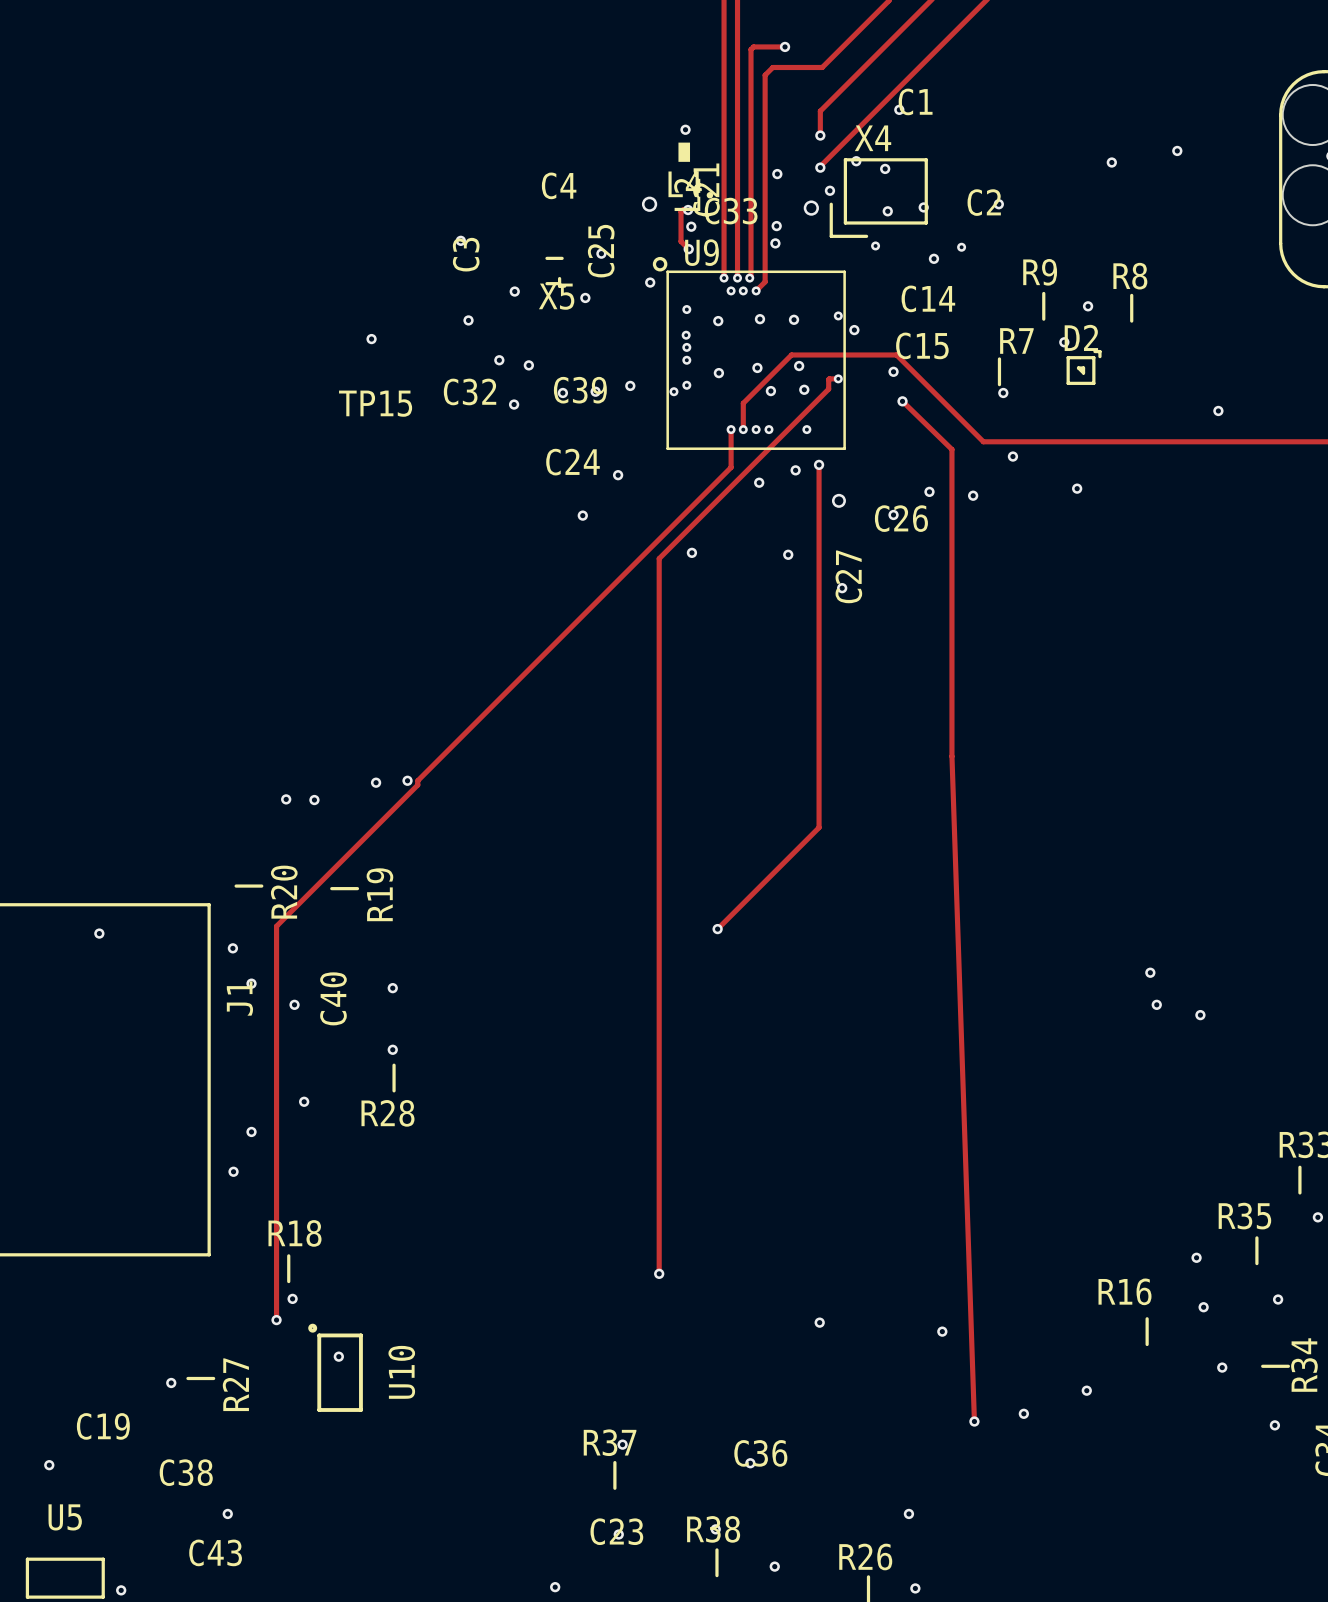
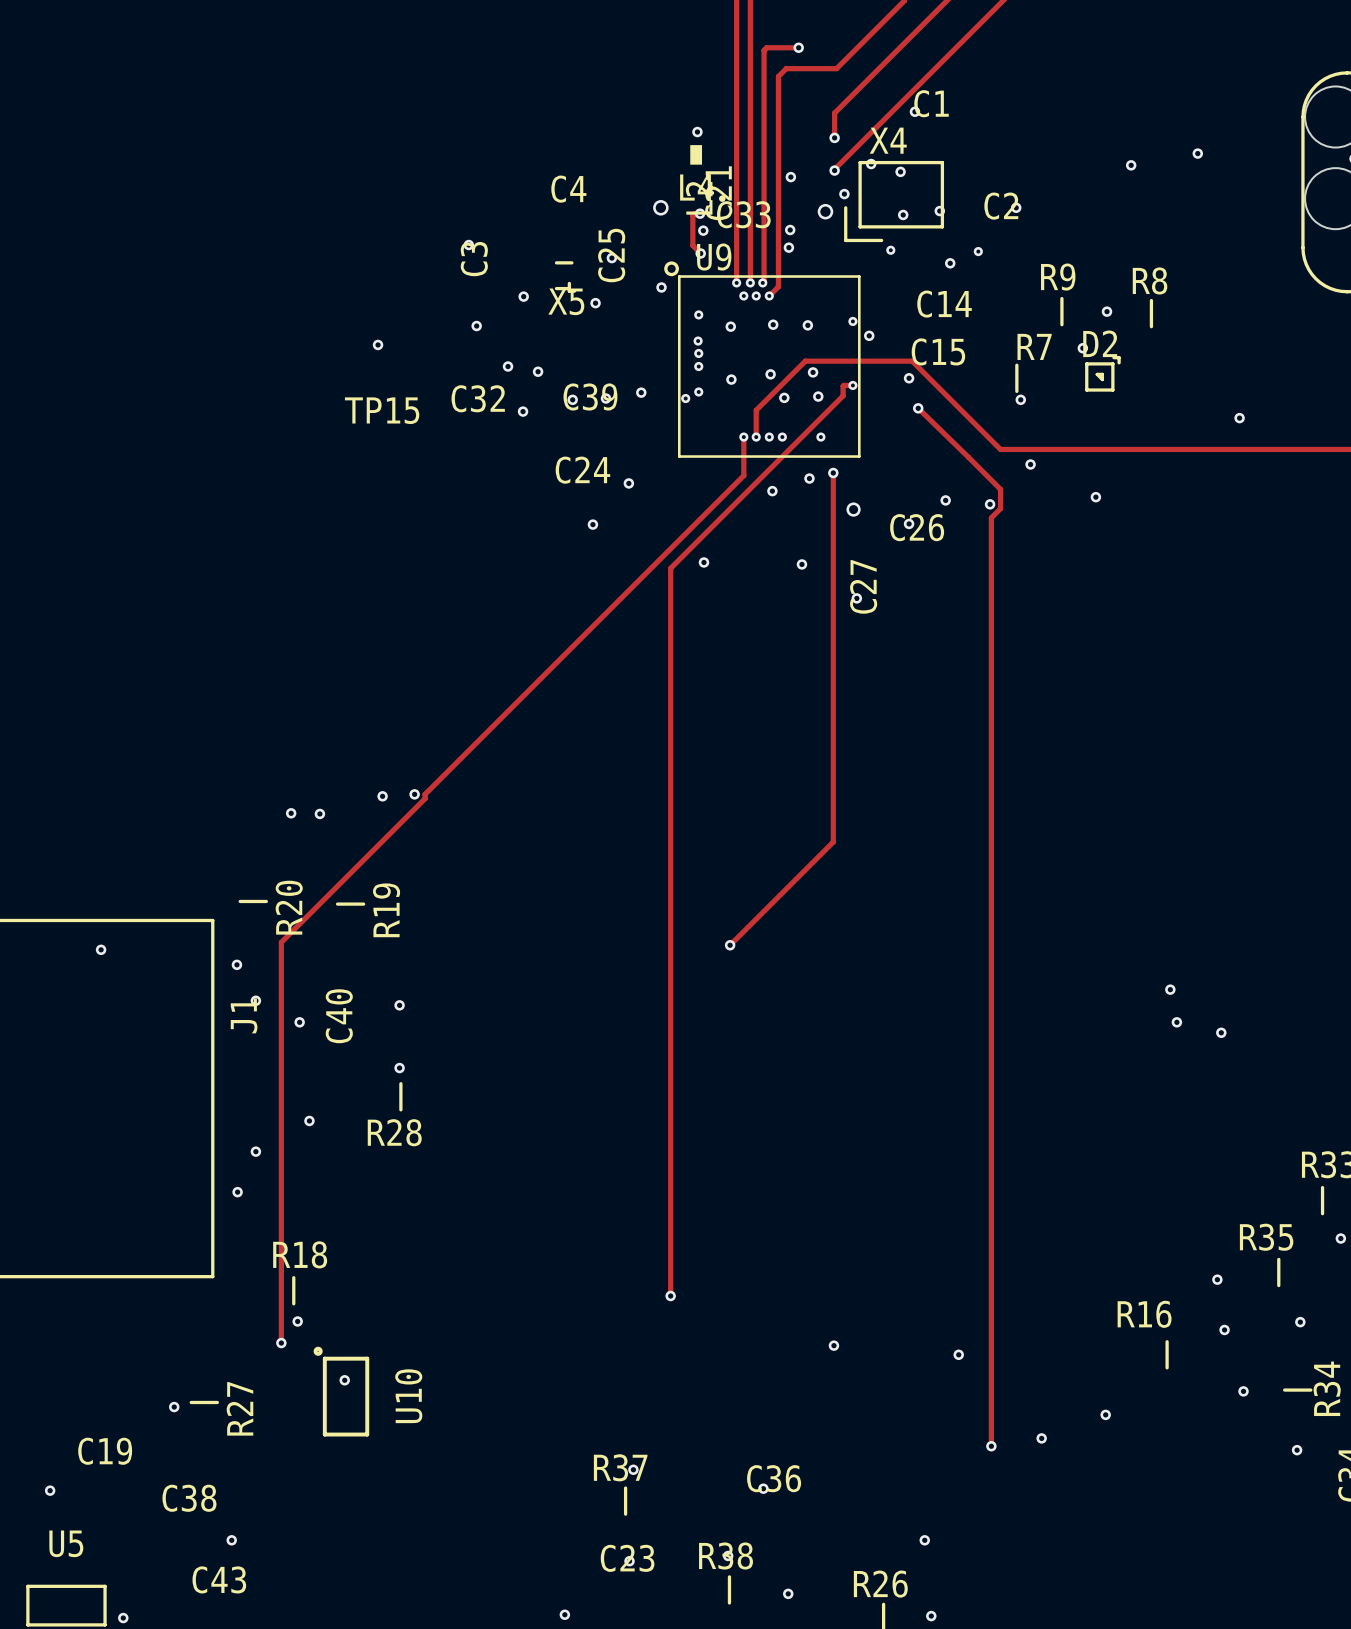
track: (951, 449) (951, 756) (974, 1421) -> (968, 457) (1000, 489) (1000, 508) (991, 517) (991, 1446)

